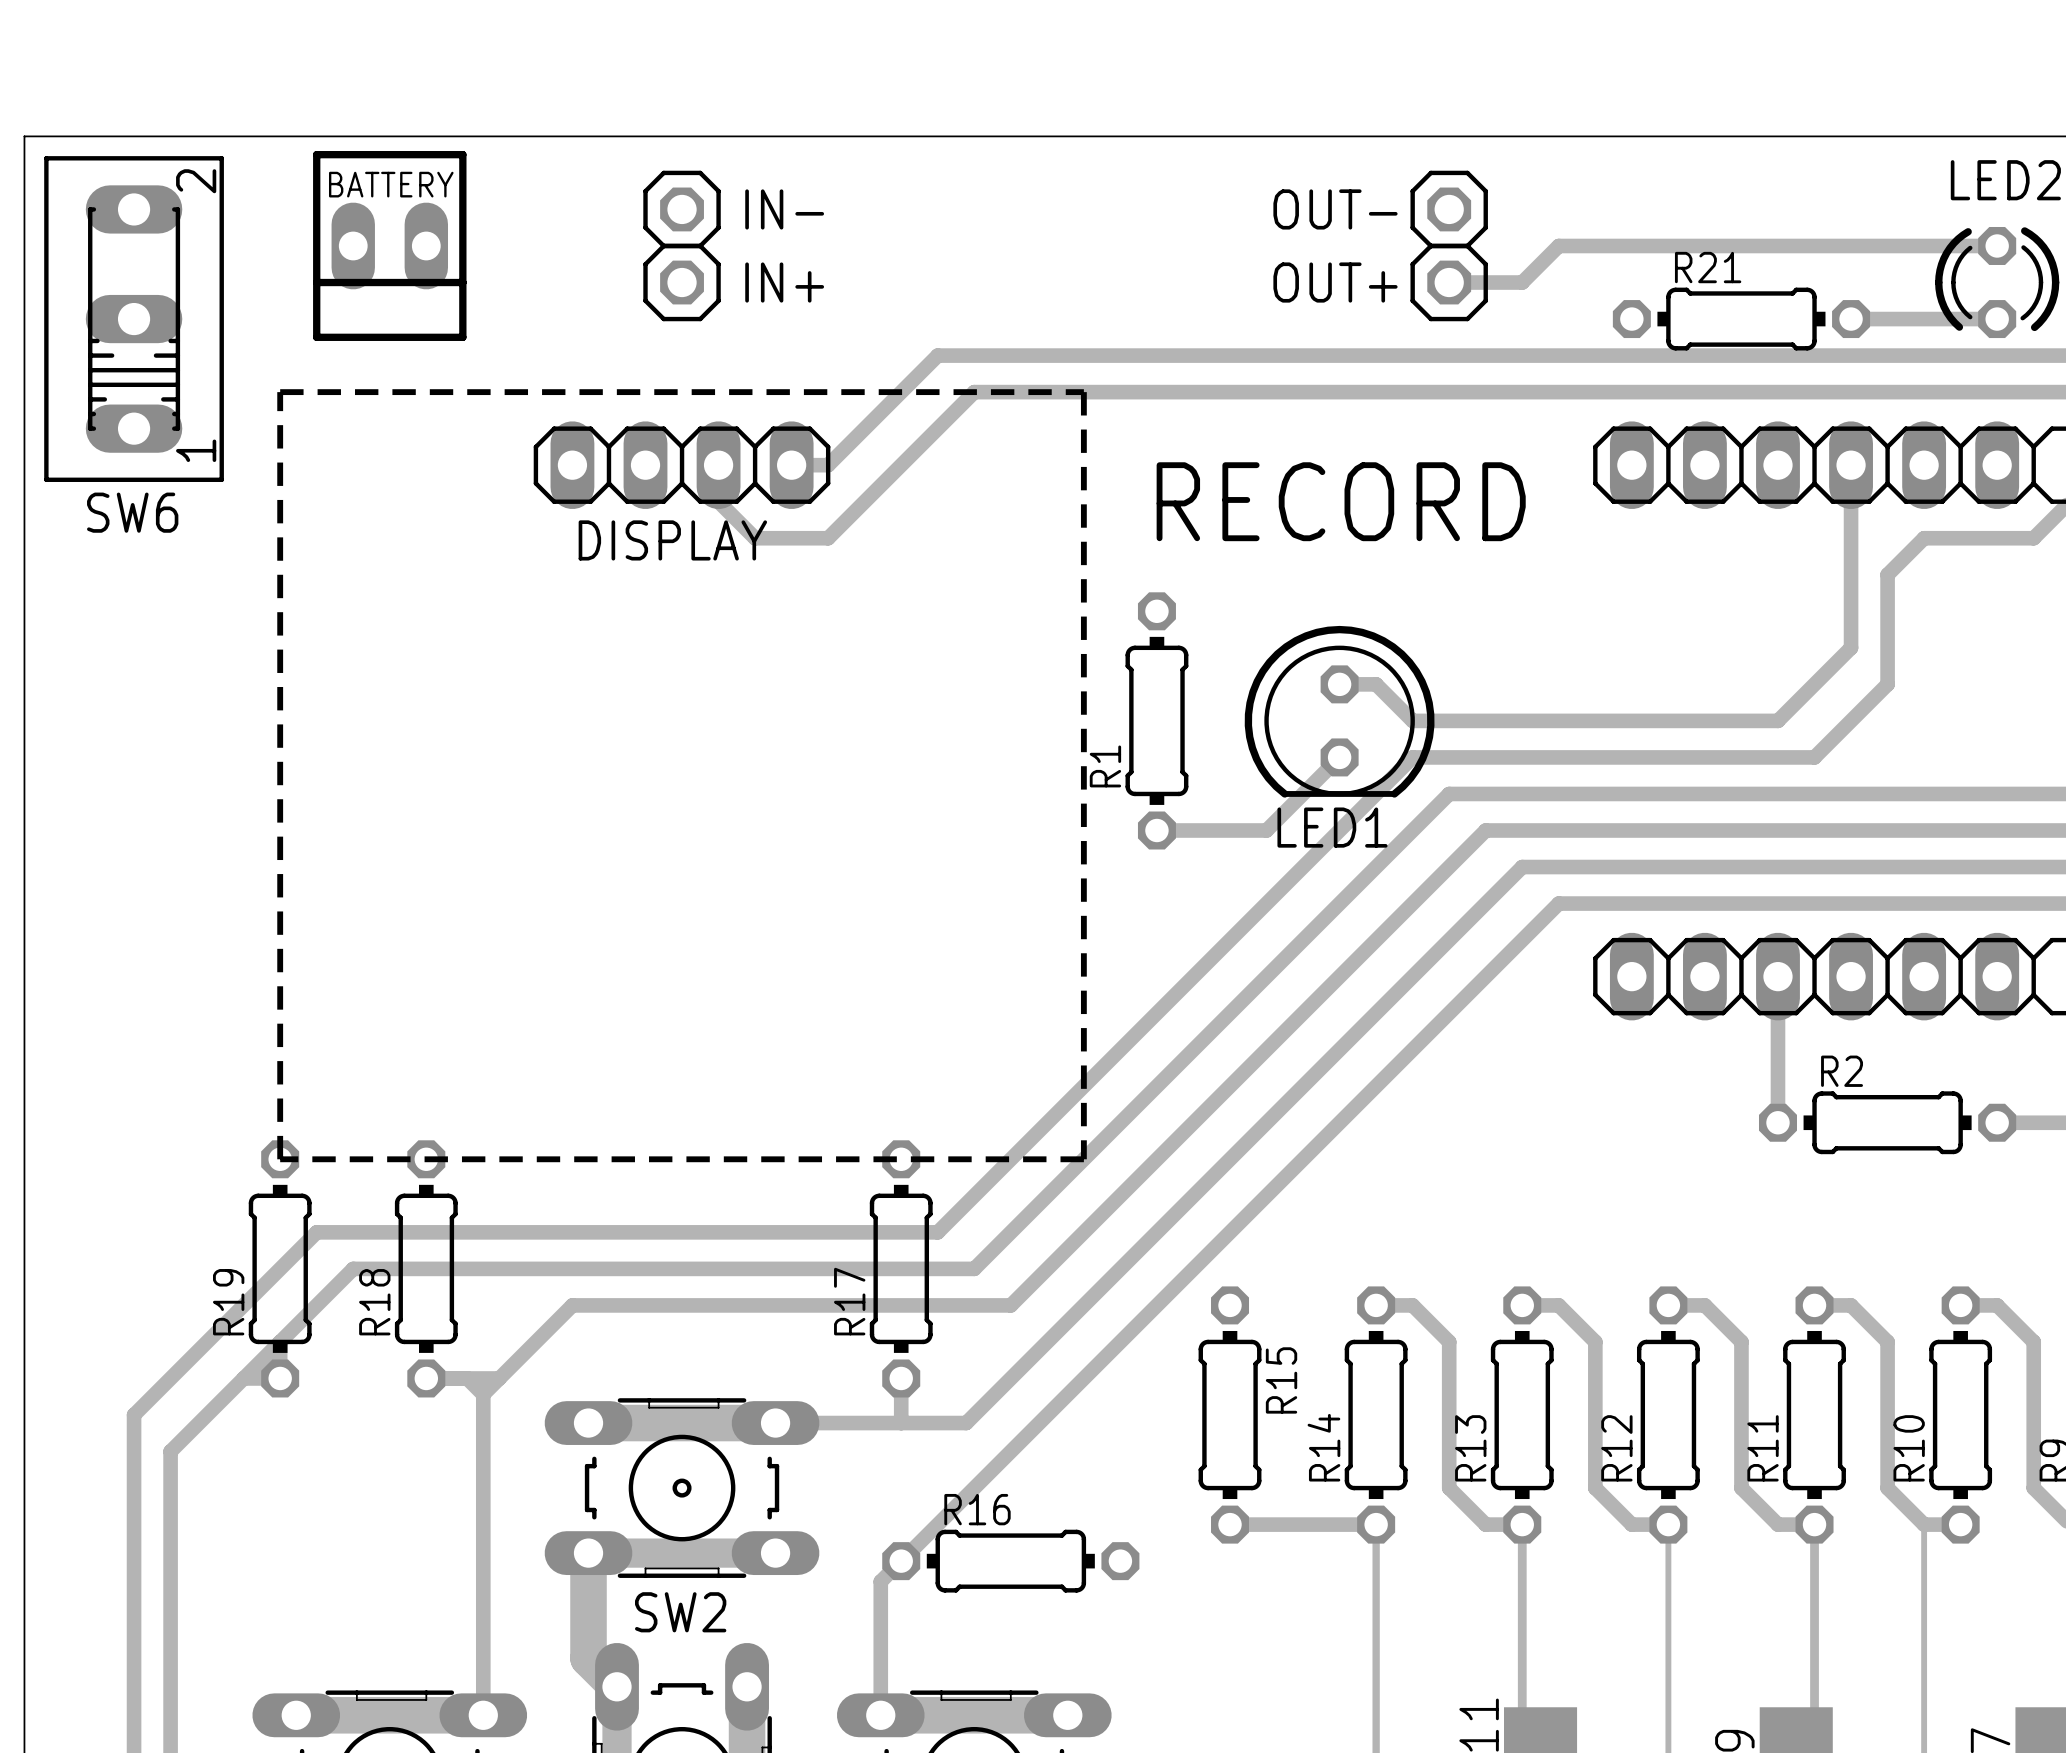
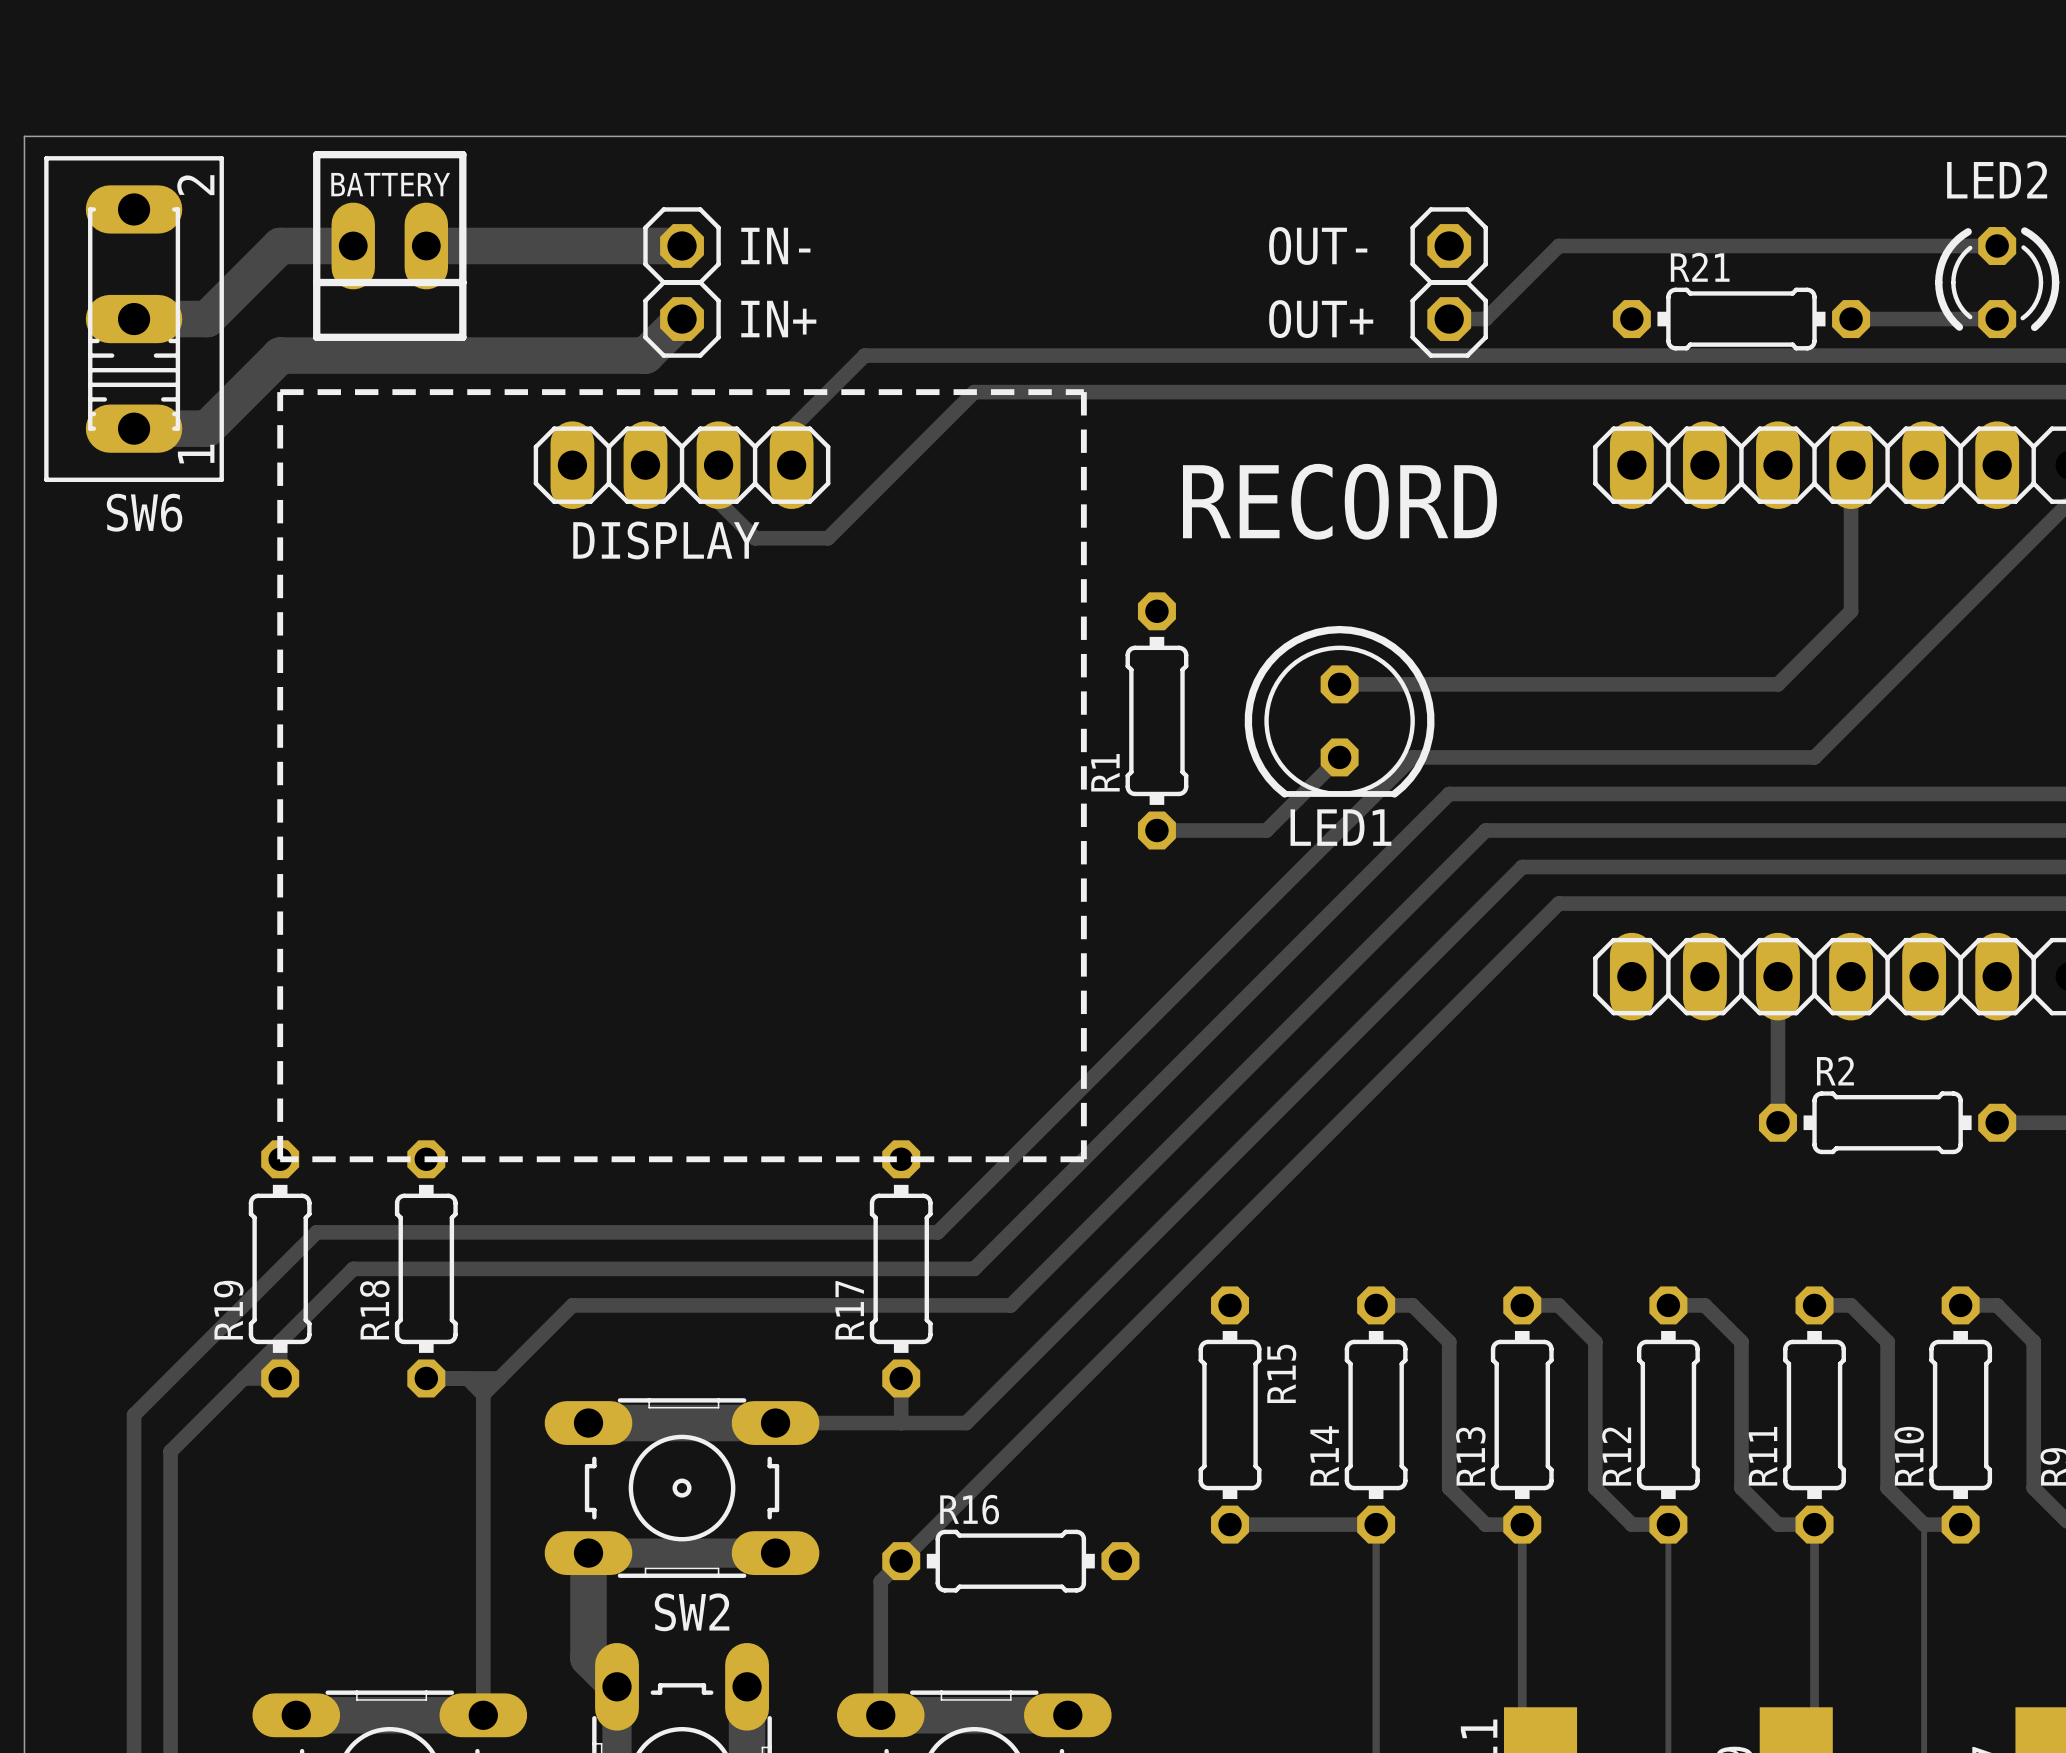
IN- position: (682, 209) -> (682, 245)
OUT- position: (1449, 209) -> (1449, 245)
track: none -> (353, 245) (280, 245) (207, 319) (134, 319)
track: none -> (426, 245) (682, 245)
IN+ position: (682, 282) -> (682, 319)
track: (1449, 282) (1522, 282) -> (1449, 319) (1485, 319) (1522, 282)
OUT+ position: (1449, 282) -> (1449, 319)
track: none -> (682, 319) (645, 355) (280, 355) (207, 428) (134, 428)
track: (937, 355) (828, 465) (791, 465) -> (937, 355) (864, 355) (791, 428) (791, 465)
track: (2033, 538) (1924, 538) (1887, 574) (1887, 684) -> (2033, 538) (1887, 684)
track: (1851, 611) (1851, 647) (1777, 720) (1412, 720) (1376, 684) -> (1851, 611) (1777, 684) (1376, 684)

